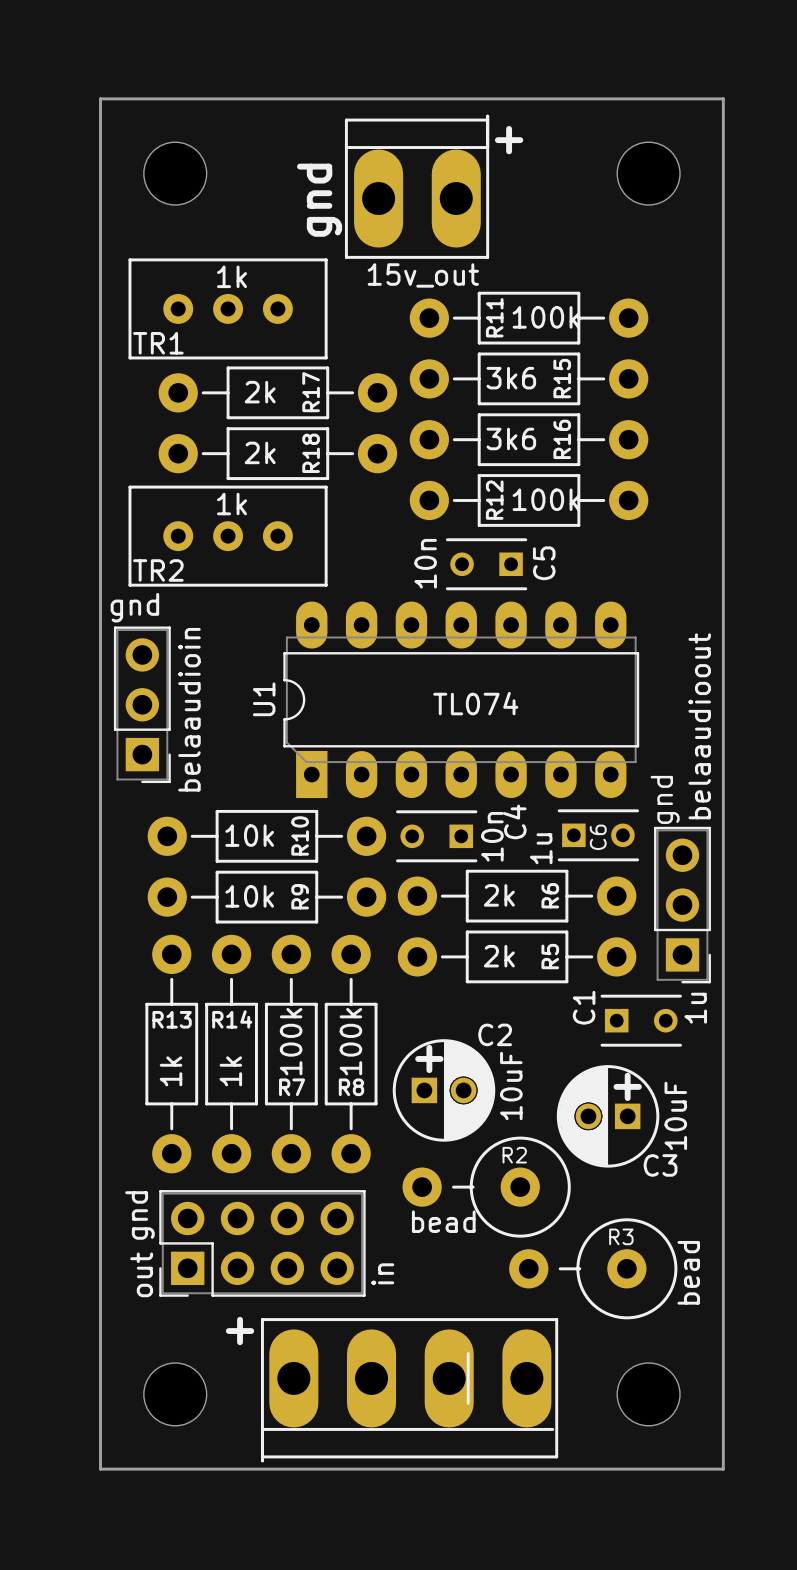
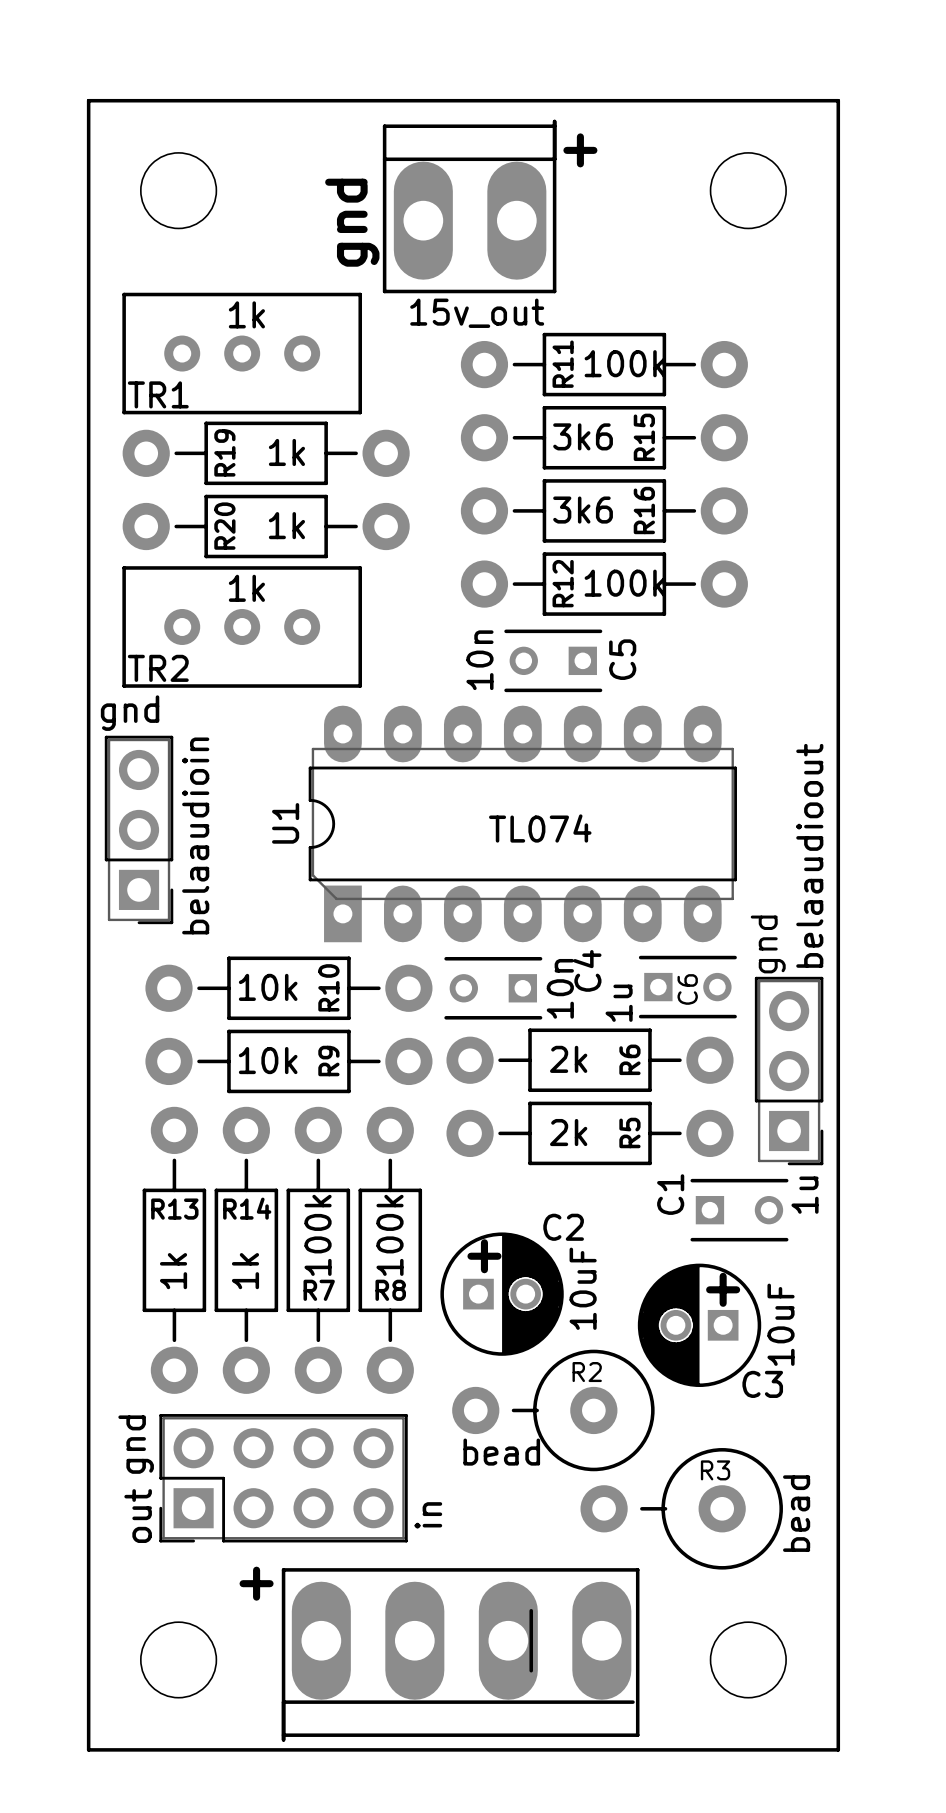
R19: none -> 1k (266, 453)
R17: 2k (277, 392) -> none
R20: none -> 1k (266, 526)
R18: 2k (277, 453) -> none

